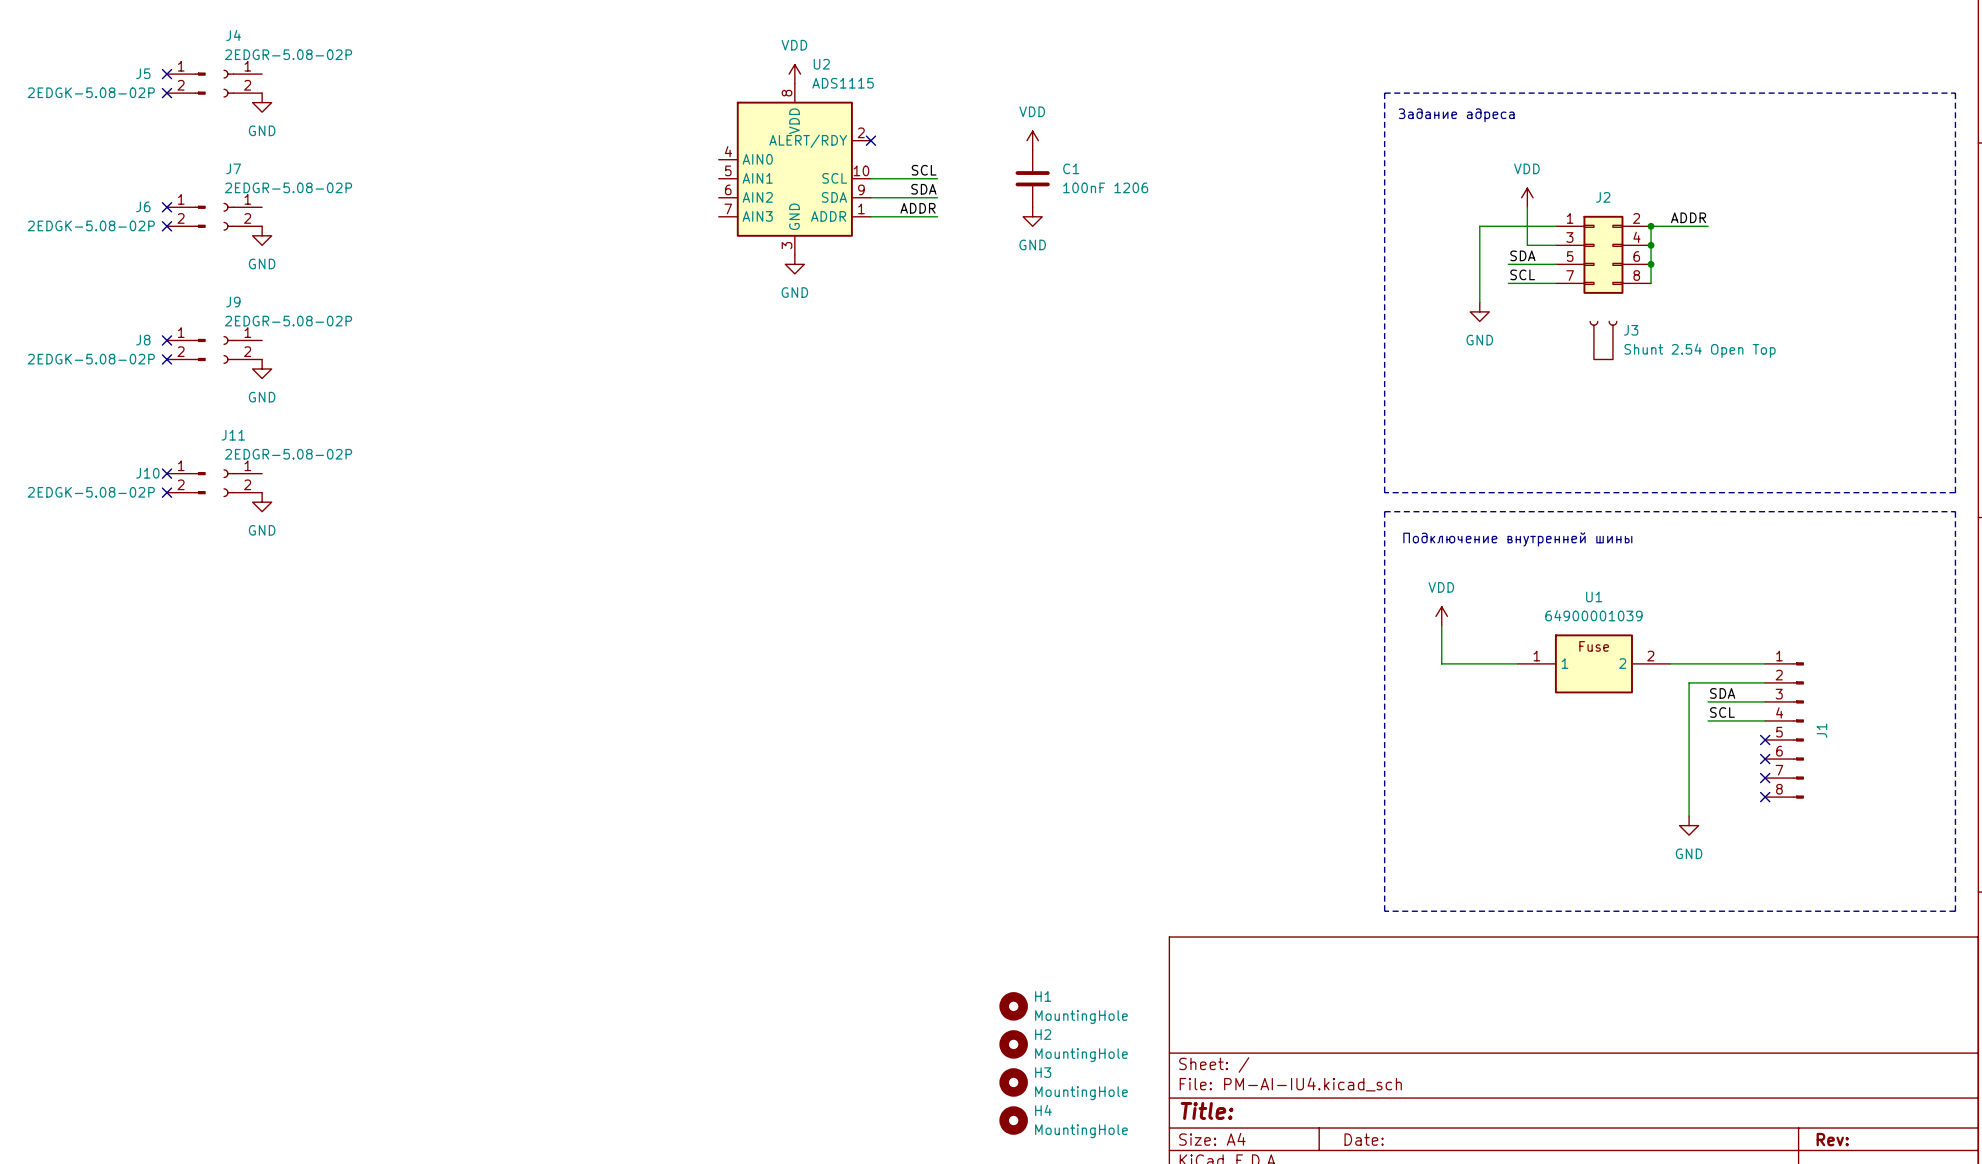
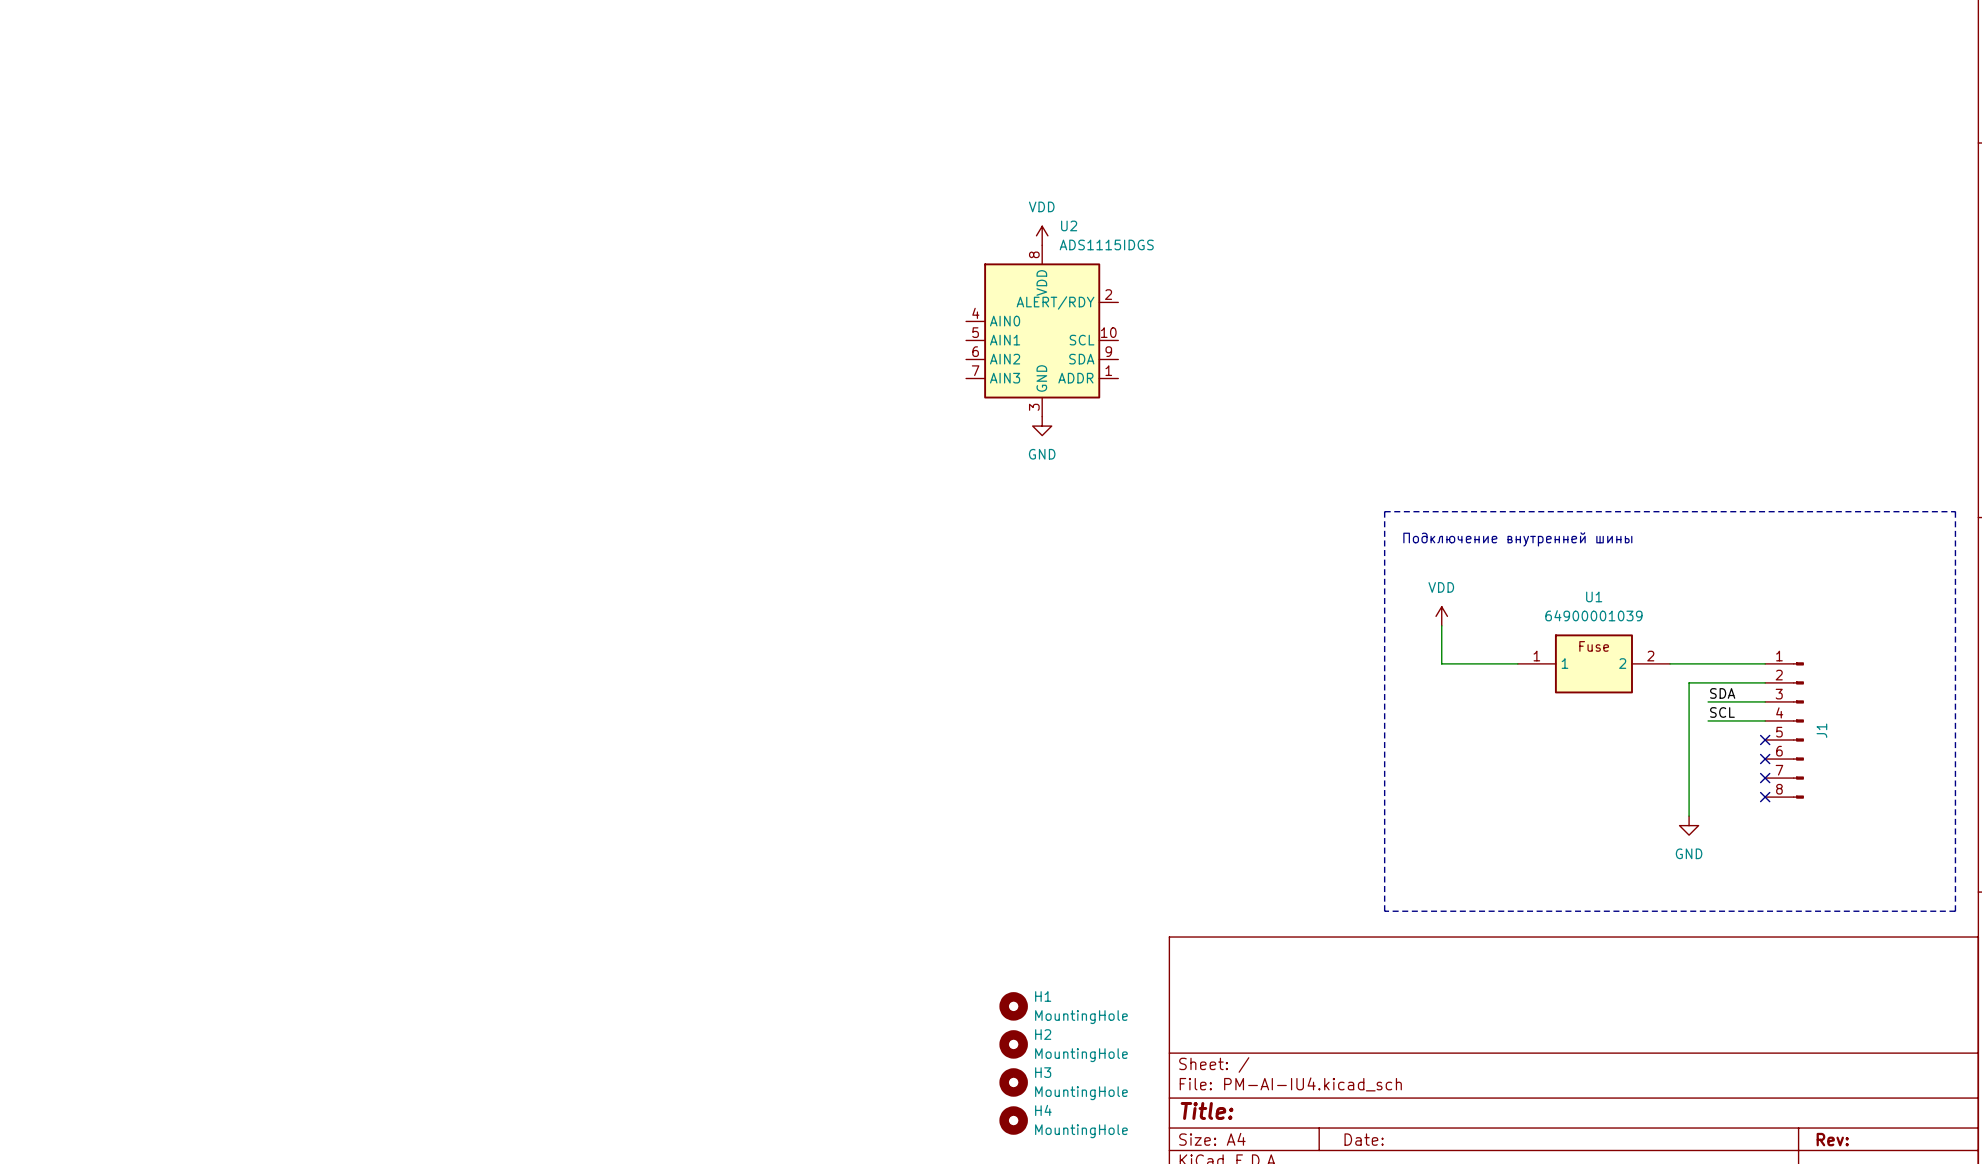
no-connect mark: (166, 74) -> none
power symbol: VDD (794, 74) -> none
J5: 2EDGK-5.08-02P (186, 83) -> none
J4: 2EDGR-5.08-02P (242, 83) -> none
U2 value: ADS1115 (843, 83) -> ADS1115IDGS (1106, 244)
no-connect mark: (166, 93) -> none
line: (1384, 93) (1955, 93) (1955, 492) (1384, 492) (1384, 93) -> none
power symbol: GND (262, 102) -> none
text: Задание адреса (1456, 115) -> none
no-connect mark: (870, 140) -> none
power symbol position: VDD (1032, 140) -> VDD (1042, 235)
U2 position: (794, 169) -> (1042, 330)
label: SCL (924, 170) -> none
wire: (870, 178) (937, 178) -> none
C1: 100nF 1206 (1032, 178) -> none
label: SDA (923, 189) -> none
wire: (870, 197) (937, 197) -> none
power symbol: VDD (1527, 197) -> none
no-connect mark: (166, 207) -> none
wire: (1527, 207) (1527, 245) (1555, 245) -> none
label: ADDR (917, 208) -> none
J6: 2EDGK-5.08-02P (186, 216) -> none
J7: 2EDGR-5.08-02P (242, 216) -> none
wire: (870, 216) (937, 216) -> none
power symbol: GND (1032, 216) -> none
label: ADDR (1688, 217) -> none
no-connect mark: (166, 226) -> none
wire: (1555, 226) (1479, 226) (1479, 302) -> none
junction: (1651, 226) -> none
wire: (1708, 226) (1651, 226) (1651, 283) -> none
power symbol: GND (262, 235) -> none
junction: (1651, 245) -> none
J2: (1603, 254) -> none
label: SDA (1522, 255) -> none
power symbol: GND (794, 264) -> none
wire: (1508, 264) (1555, 264) -> none
junction: (1651, 264) -> none
label: SCL (1522, 274) -> none
wire: (1508, 283) (1555, 283) -> none
power symbol: GND (1479, 311) -> none
no-connect mark: (166, 340) -> none
J3: Shunt 2.54 Open Top (1603, 340) -> none
J8: 2EDGK-5.08-02P (186, 349) -> none
J9: 2EDGR-5.08-02P (242, 349) -> none
no-connect mark: (166, 359) -> none
power symbol: GND (262, 369) -> none
power symbol: none -> GND (1042, 426)
no-connect mark: (166, 473) -> none
J10: 2EDGK-5.08-02P (186, 483) -> none
J11: 2EDGR-5.08-02P (242, 483) -> none
no-connect mark: (166, 492) -> none
power symbol: GND (262, 502) -> none

